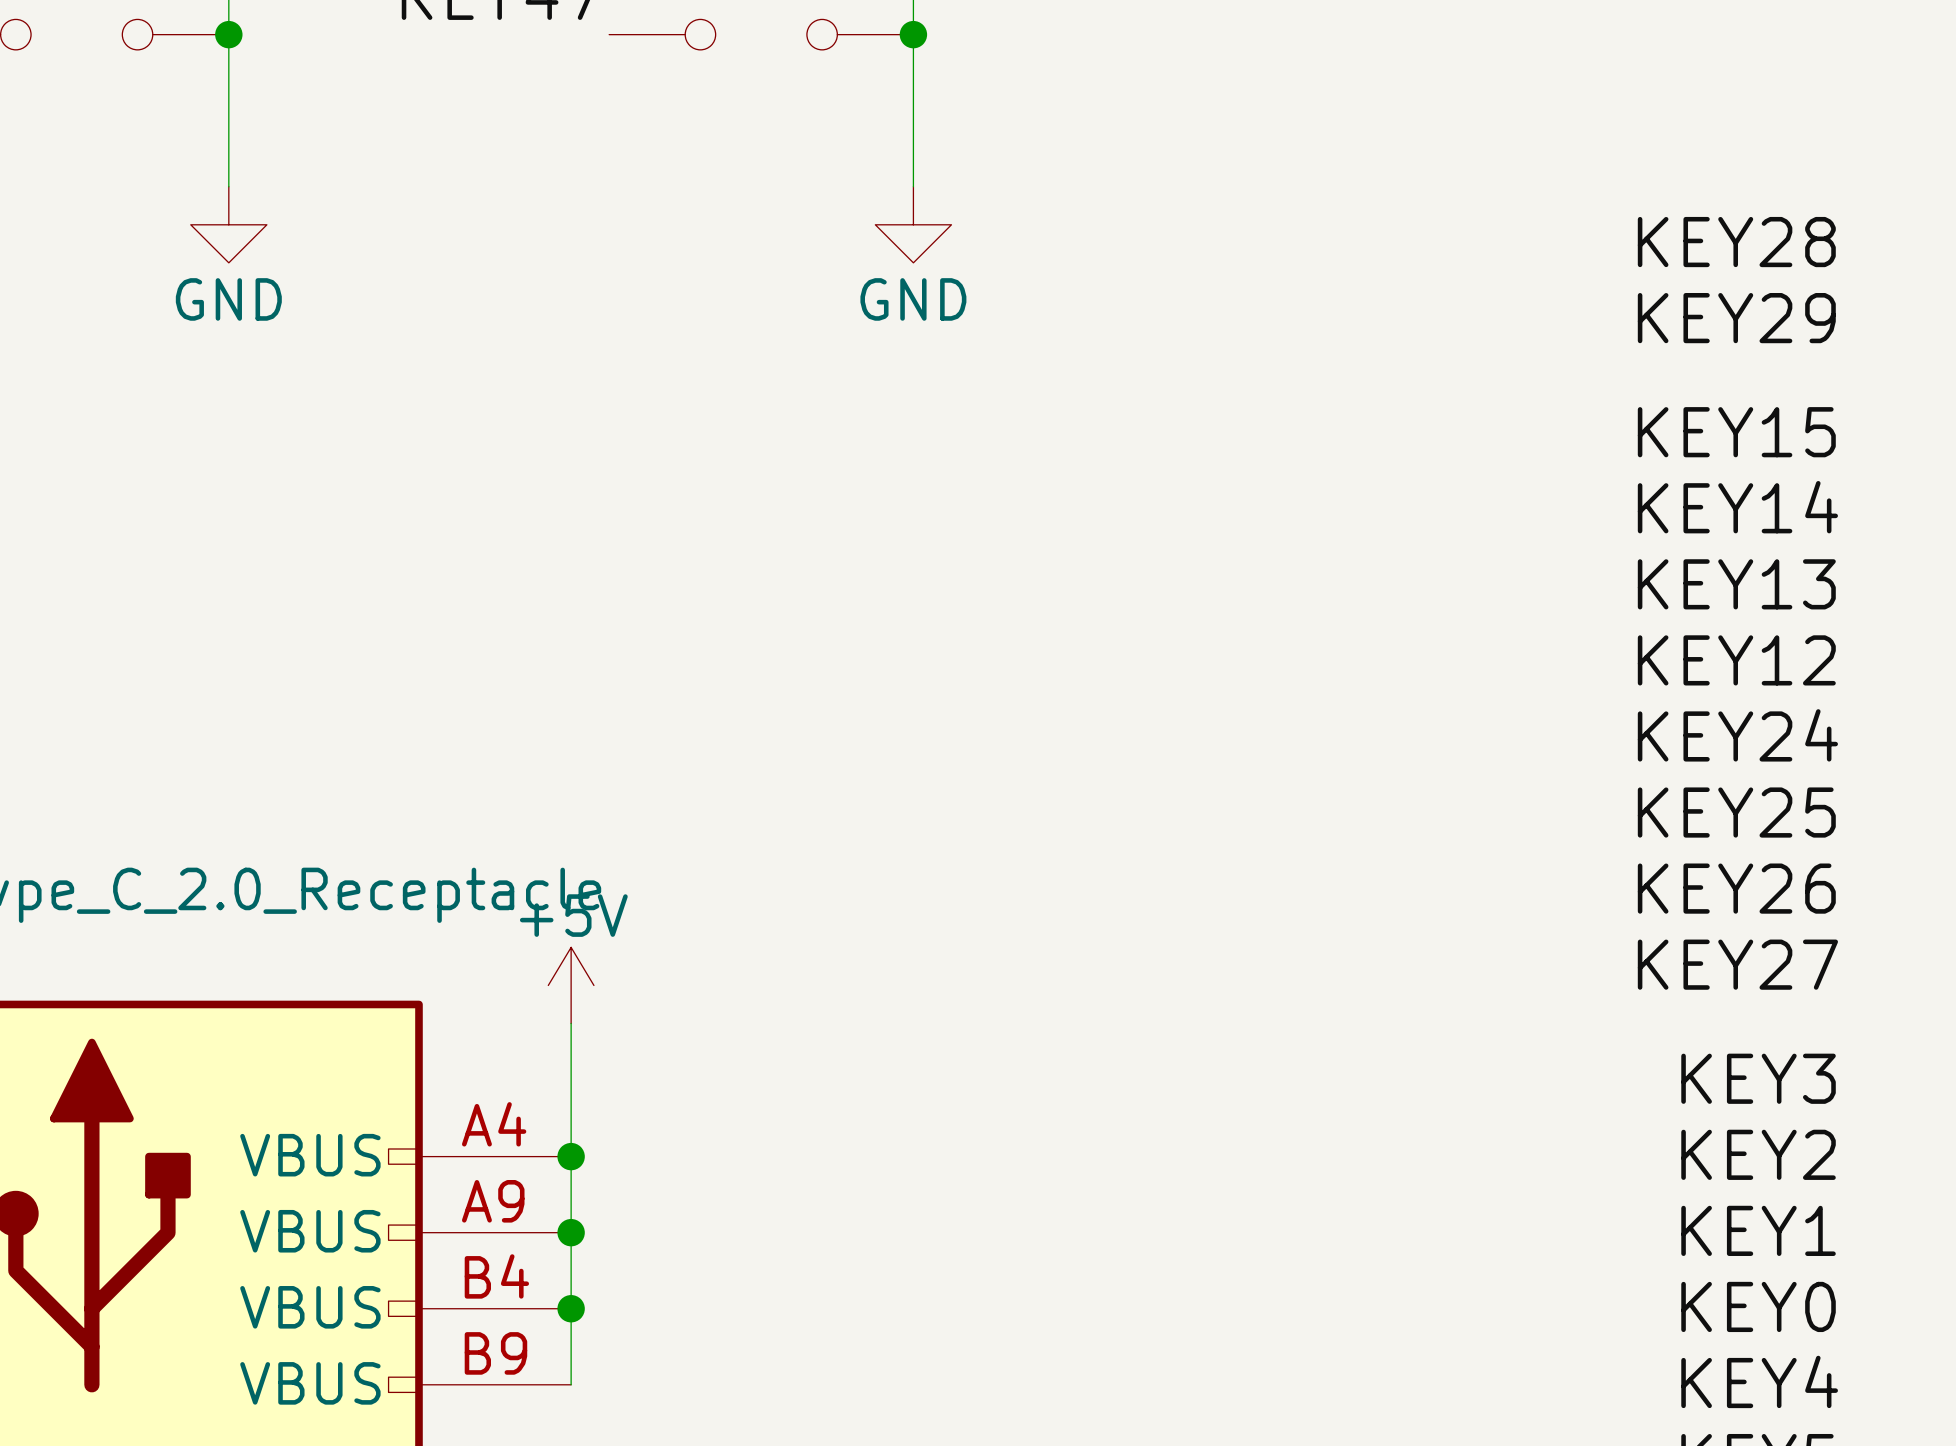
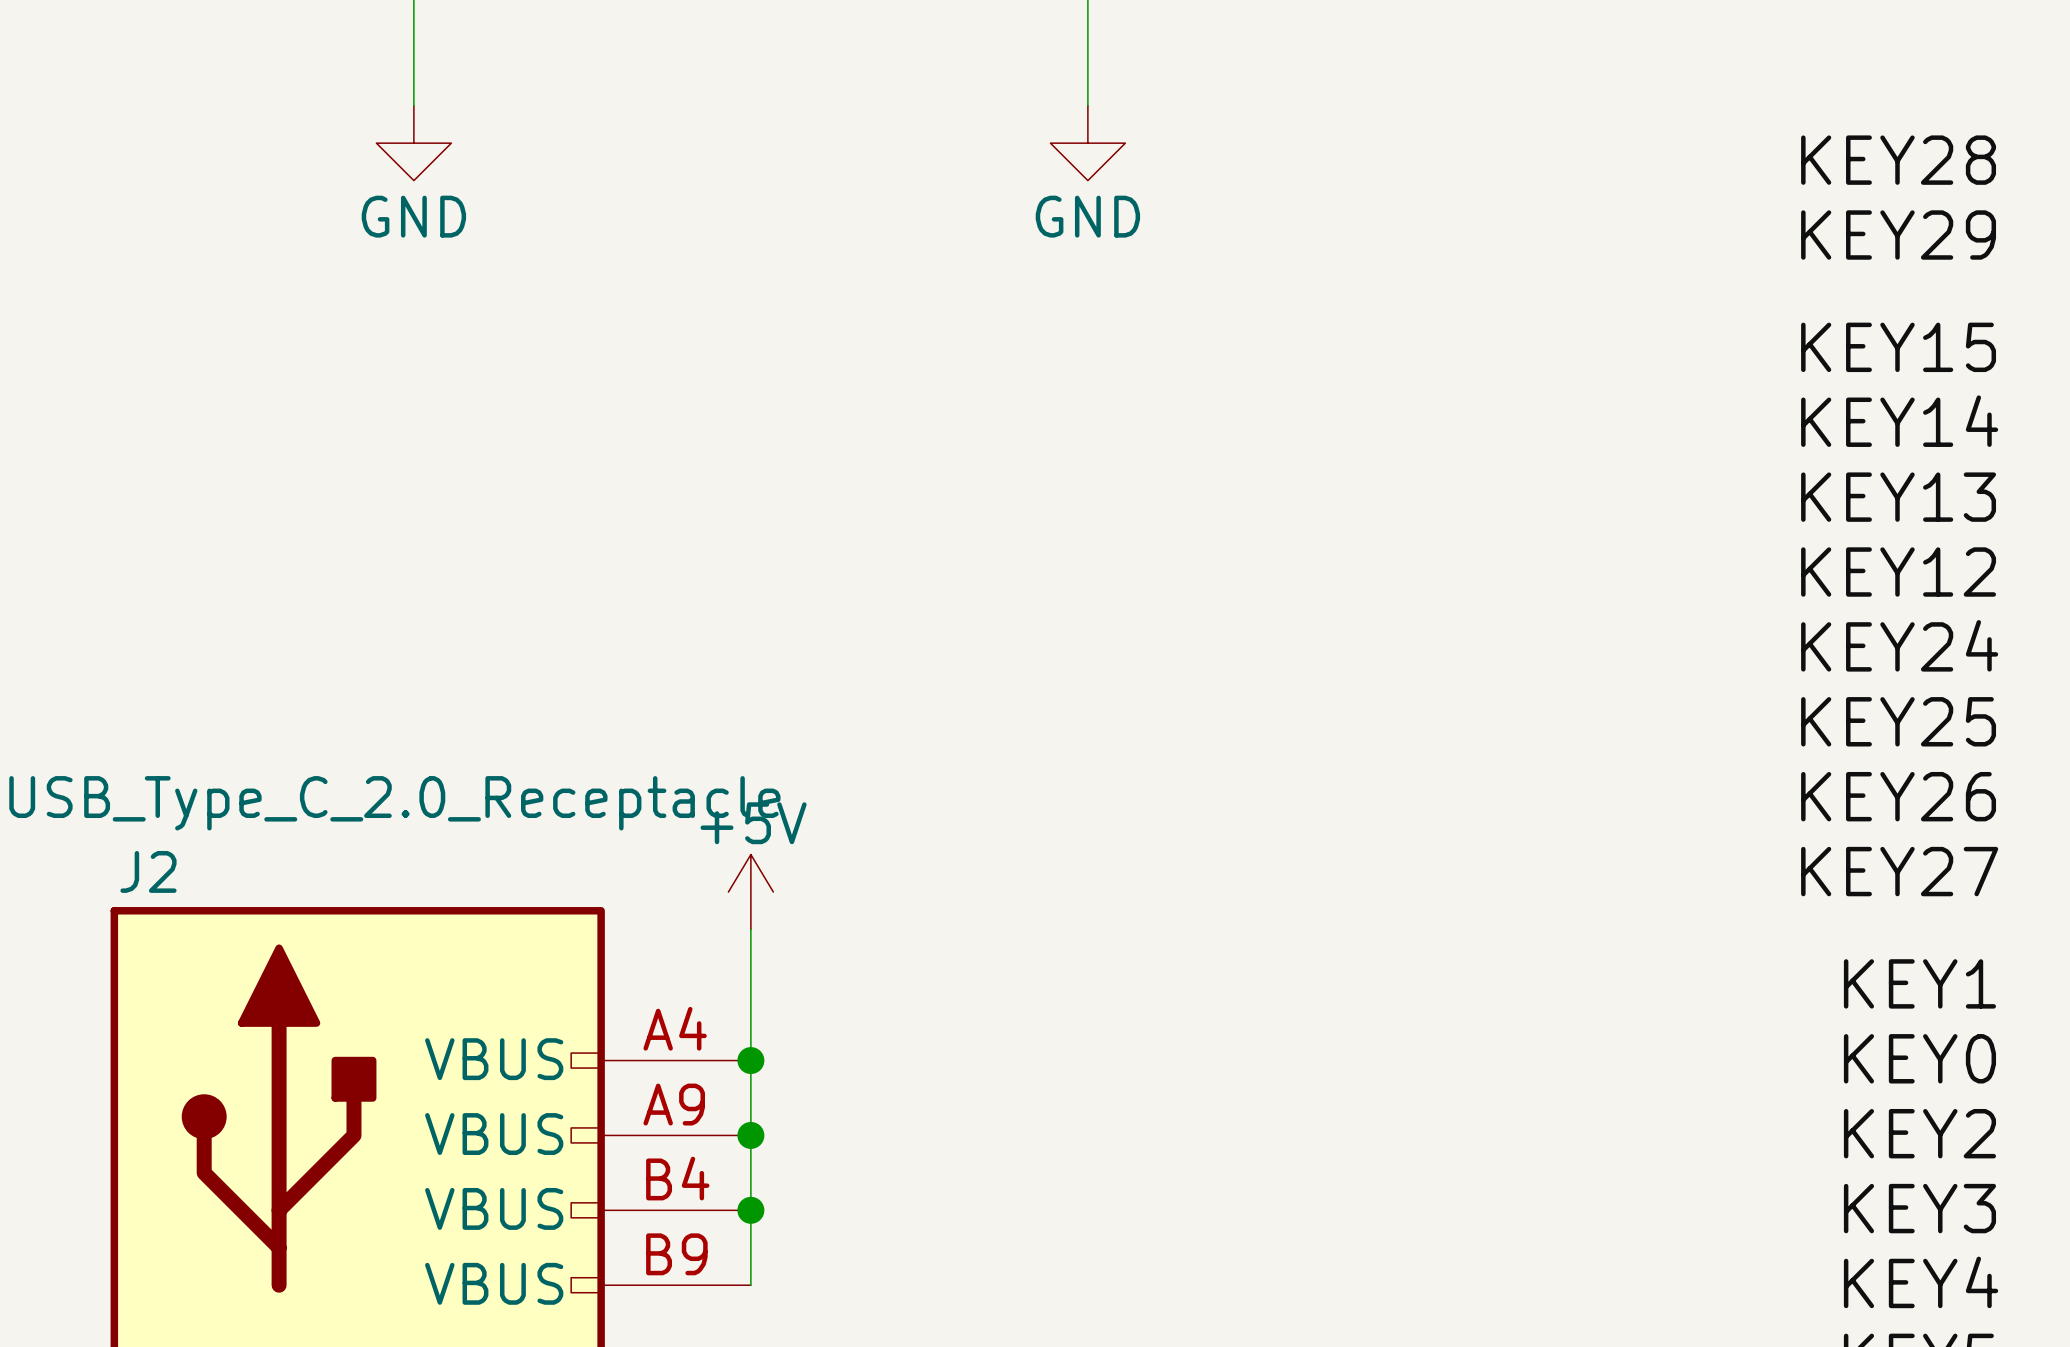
label: KEY3 (1758, 1078) -> KEY1 (1919, 983)
label: KEY2 (1758, 1154) -> KEY0 (1919, 1058)
label: KEY1 (1758, 1230) -> KEY2 (1919, 1133)
label: KEY0 (1758, 1306) -> KEY3 (1919, 1208)

